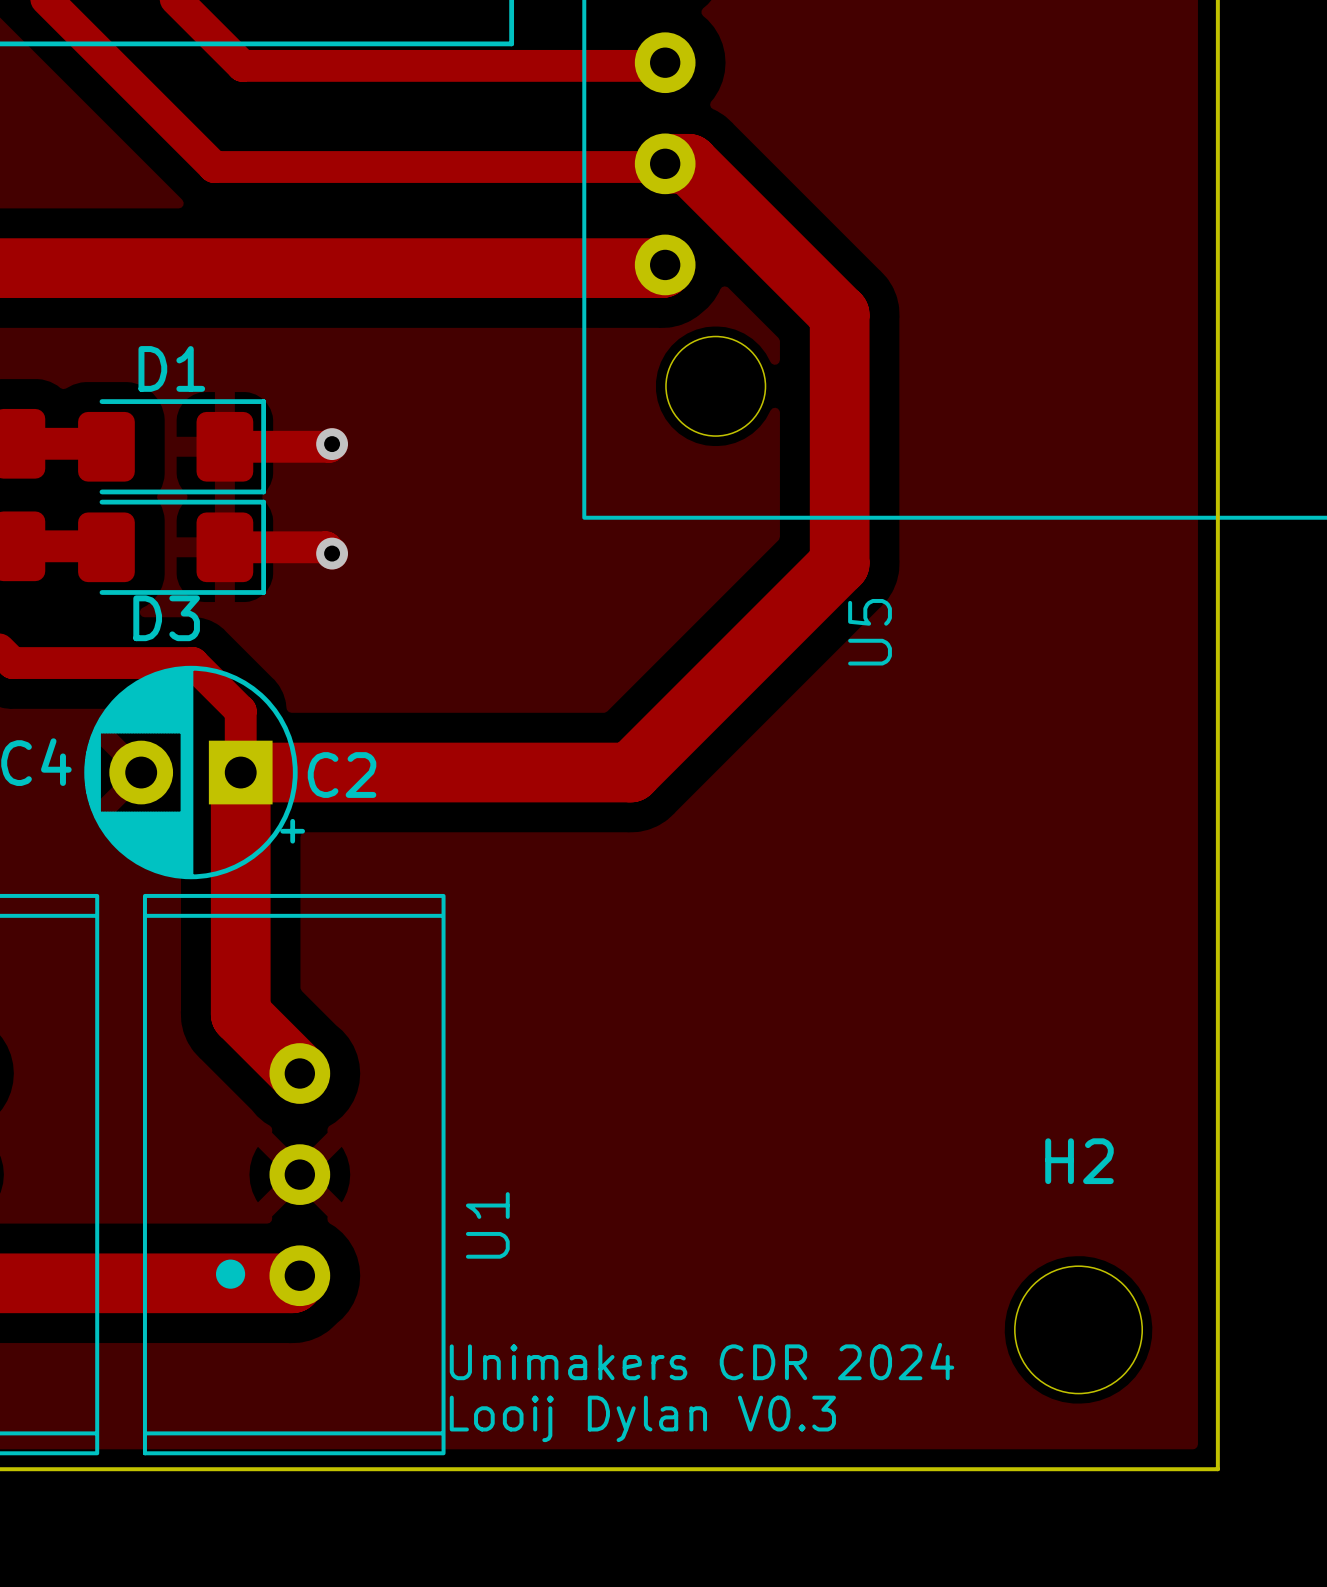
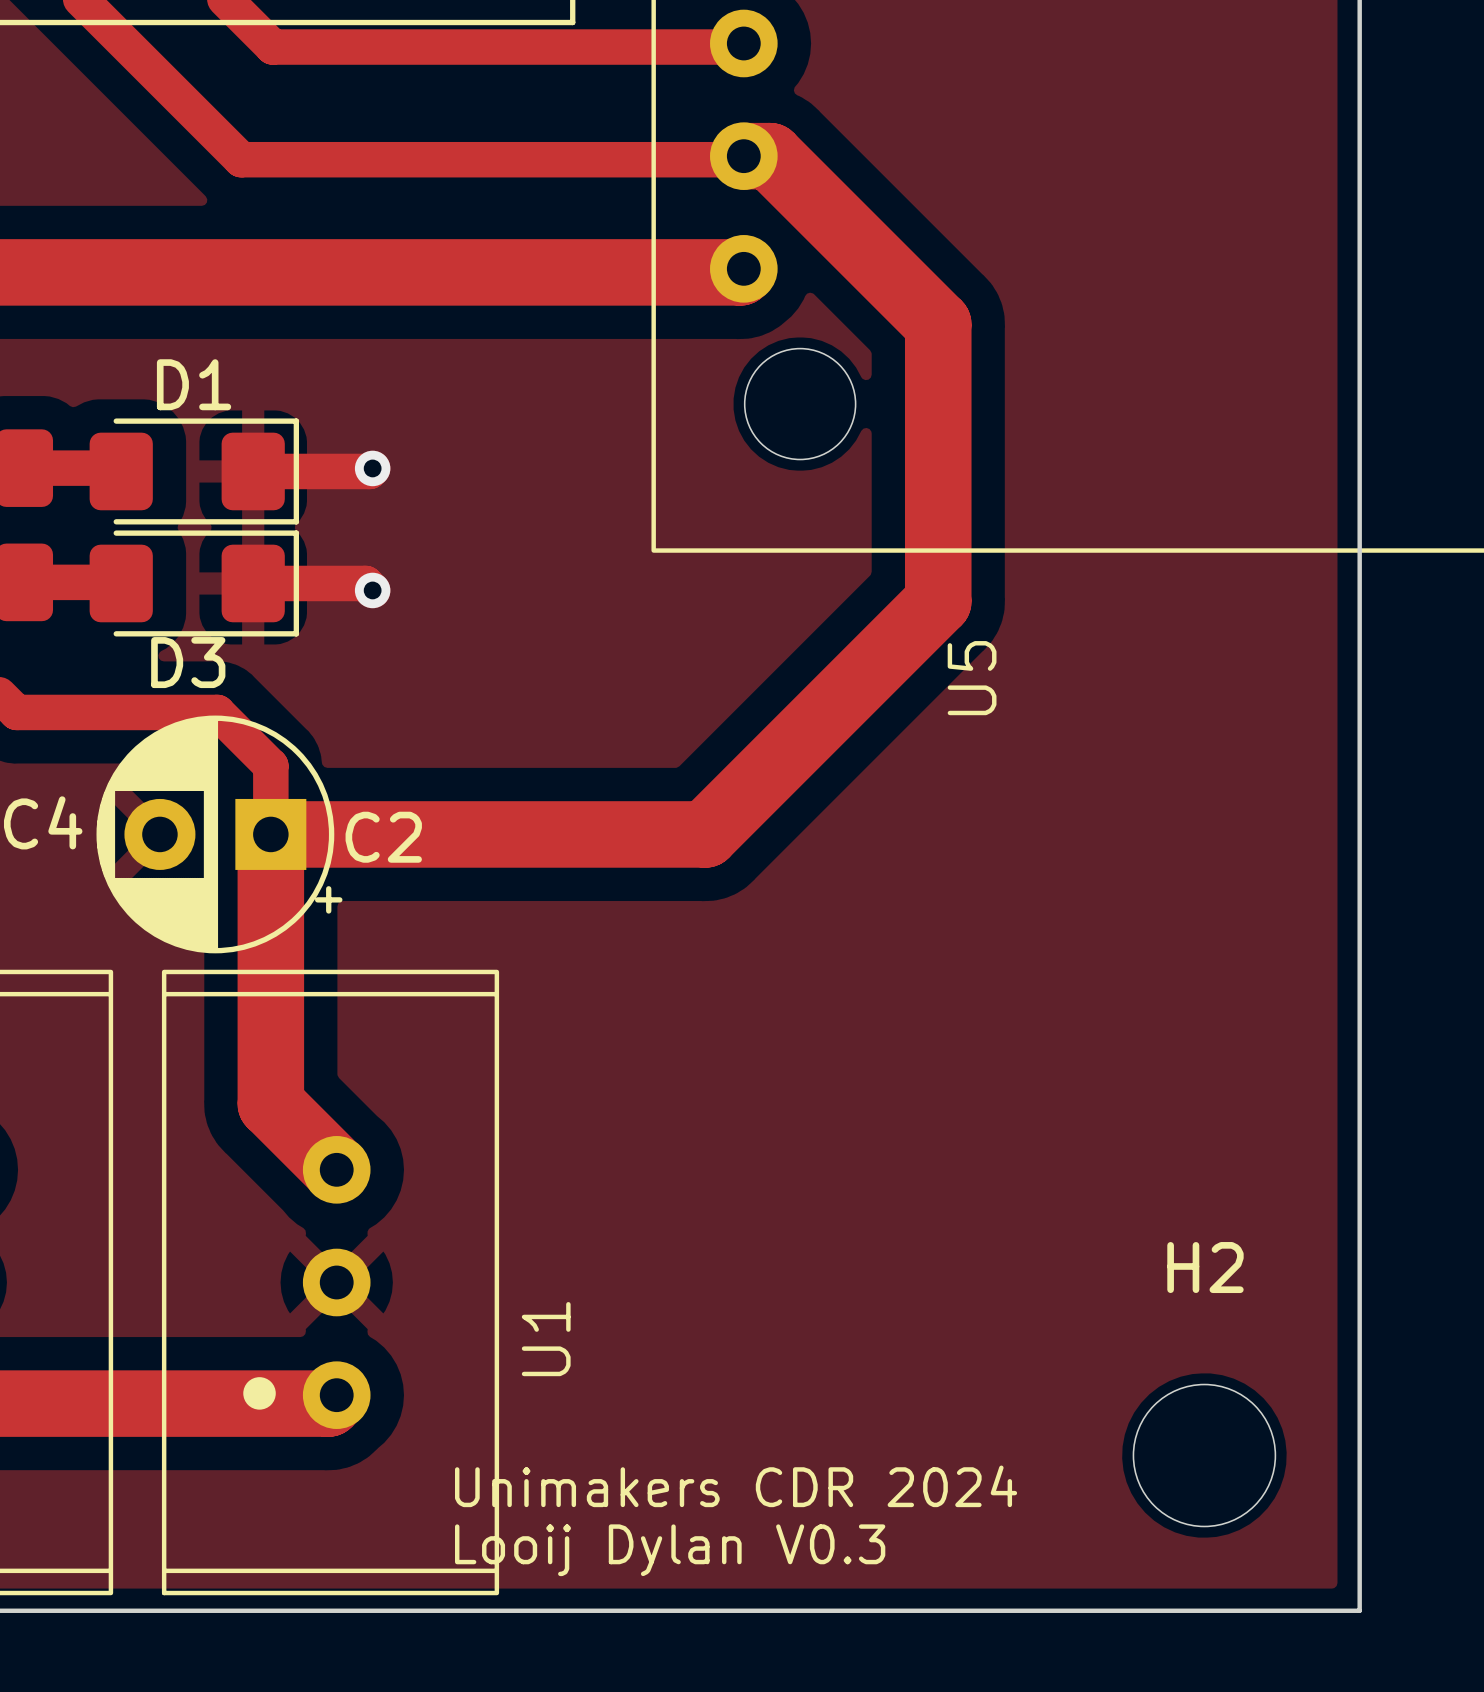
text position: Unimakers CDR 2024 (702, 1361) -> Unimakers CDR 2024 (736, 1486)
text position: Looij Dylan V0.3 (642, 1418) -> Looij Dylan V0.3 (670, 1550)

